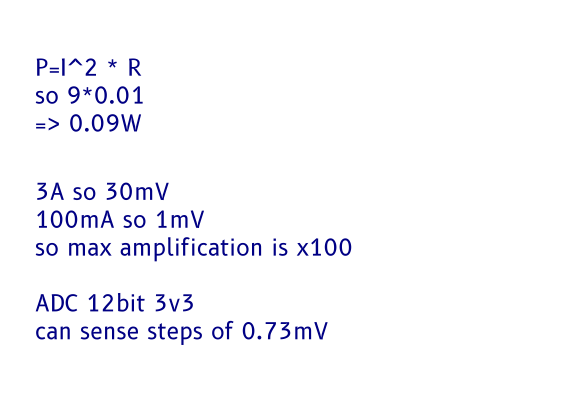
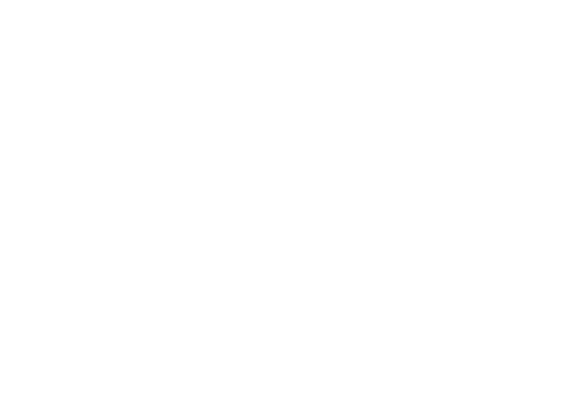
text: P=I^2 * R (89, 67) -> none
text: so 9*0.01 (89, 95) -> none
text: => 0.09W (88, 122) -> none
text: 3A so 30mV (102, 191) -> none
text: 100mA so 1mV (120, 219) -> none
text: so max amplification is x100 (193, 249) -> none
text: ADC 12bit 3v3 (114, 302) -> none
text: can sense steps of 0.73mV (181, 332) -> none

